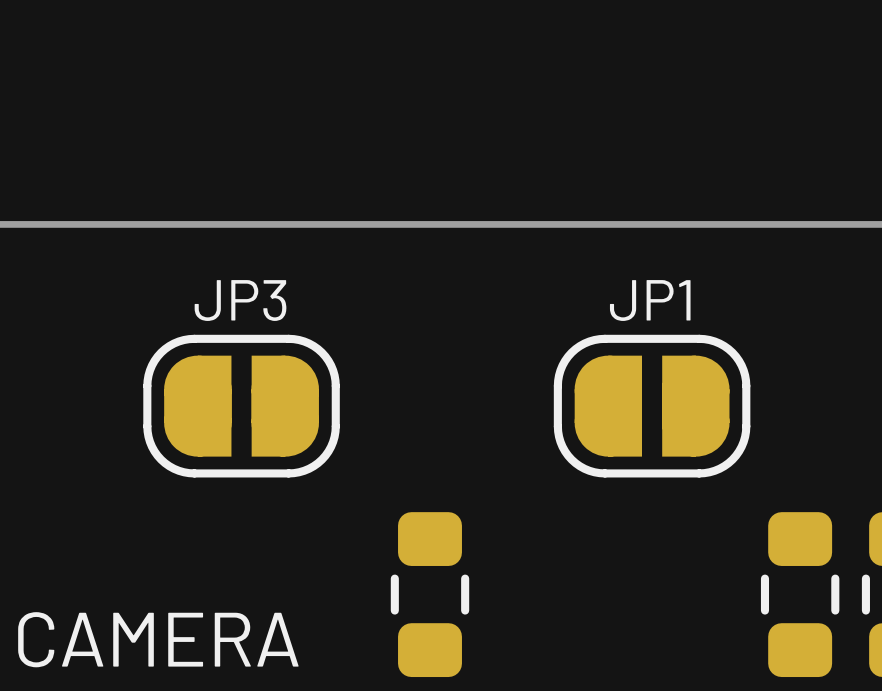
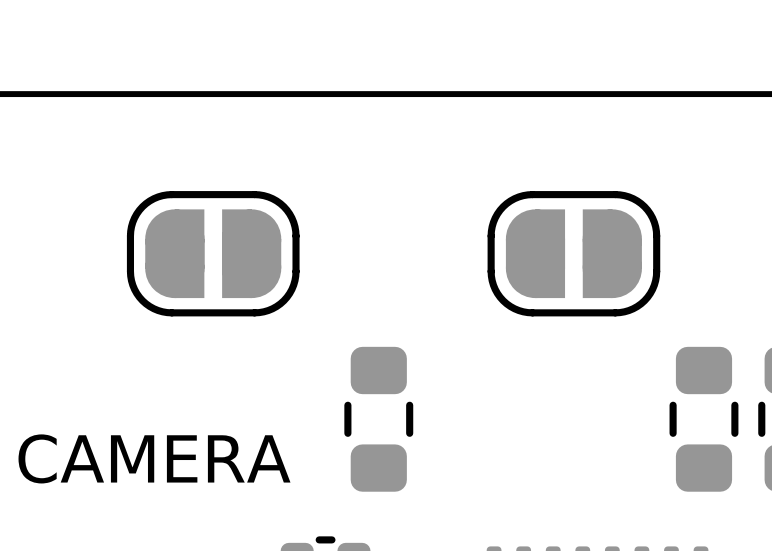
JP3 name: JP3 (240, 300) -> none
JP1 name: JP1 (650, 300) -> none

